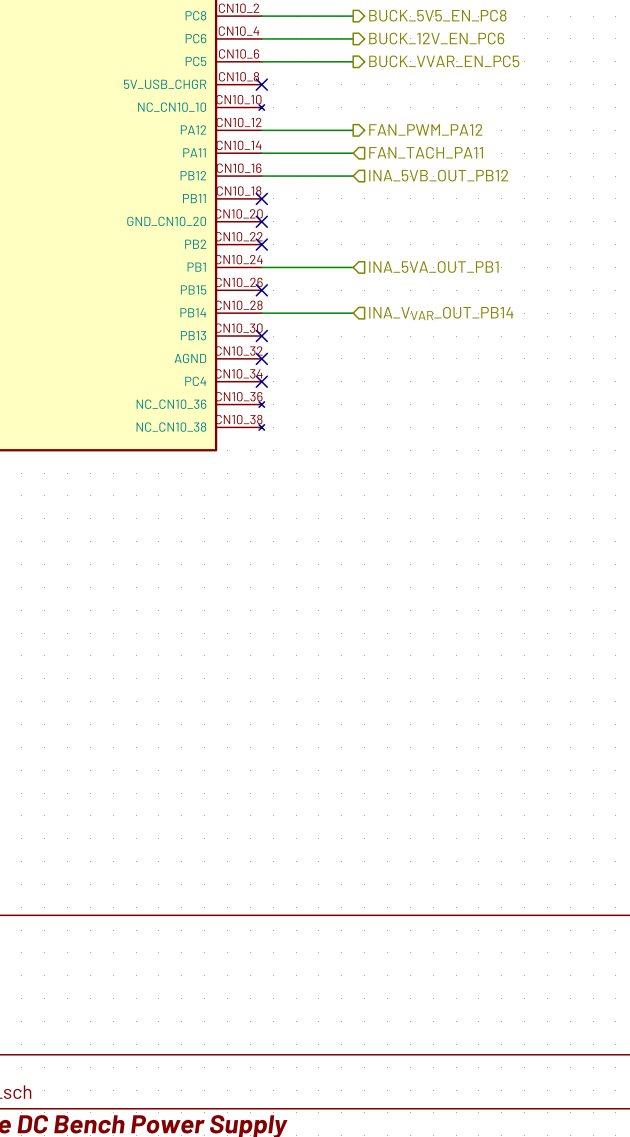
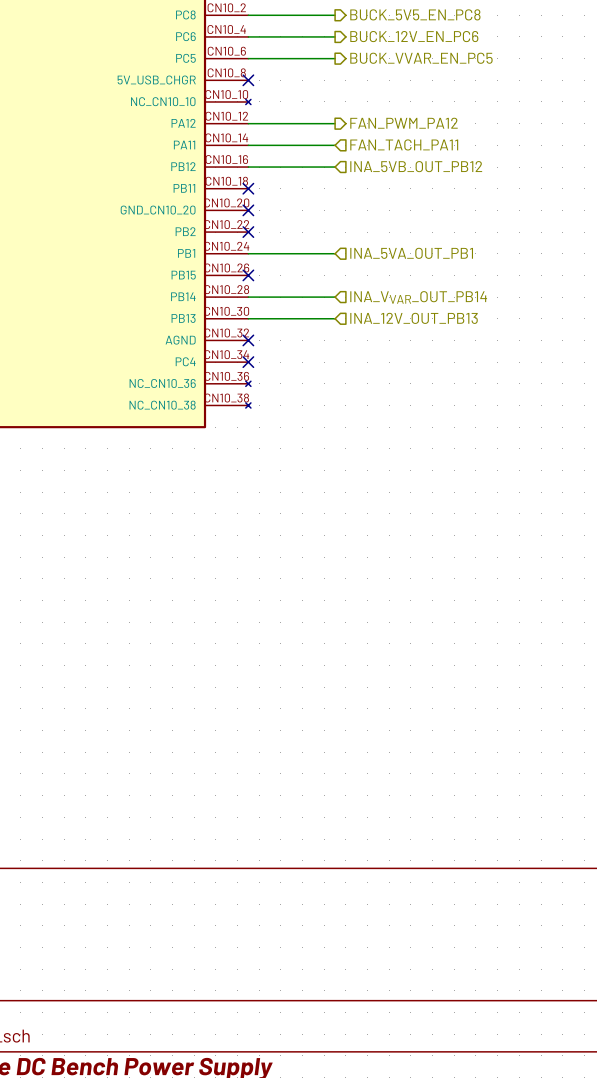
hierarchical label: none -> INA_12V_OUT_PB13 (414, 318)
wire: none -> (248, 318) (335, 318)
no-connect mark: (261, 336) -> none

